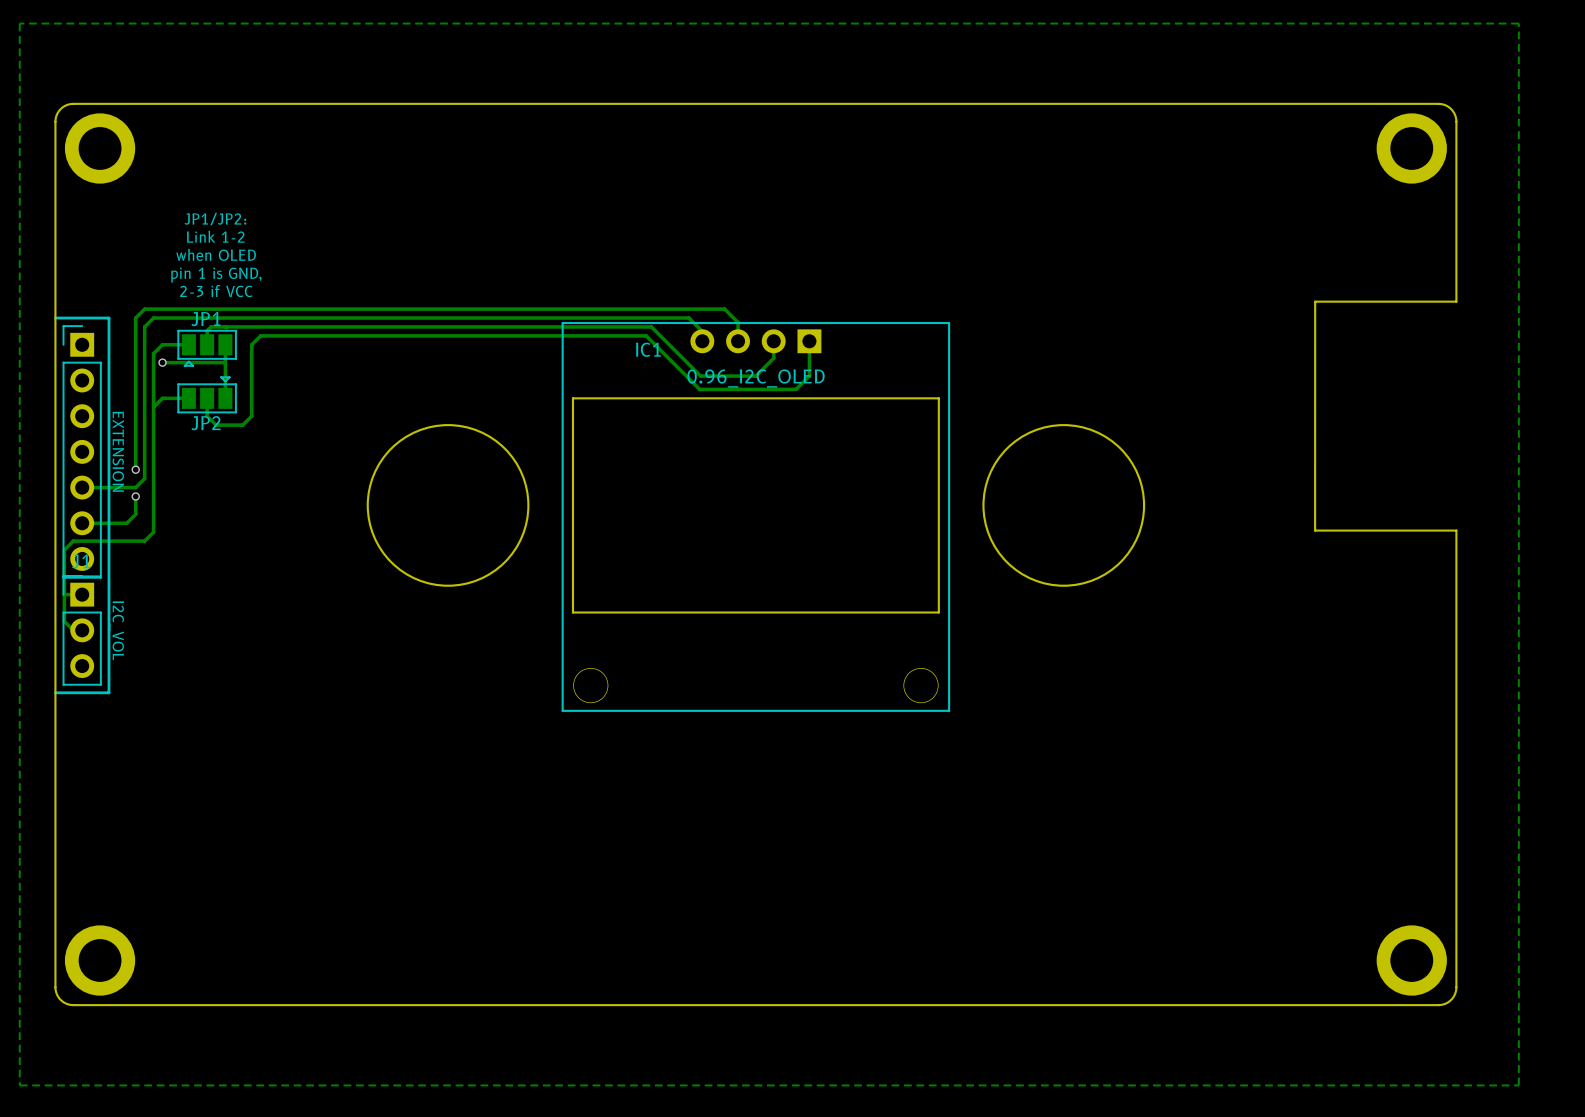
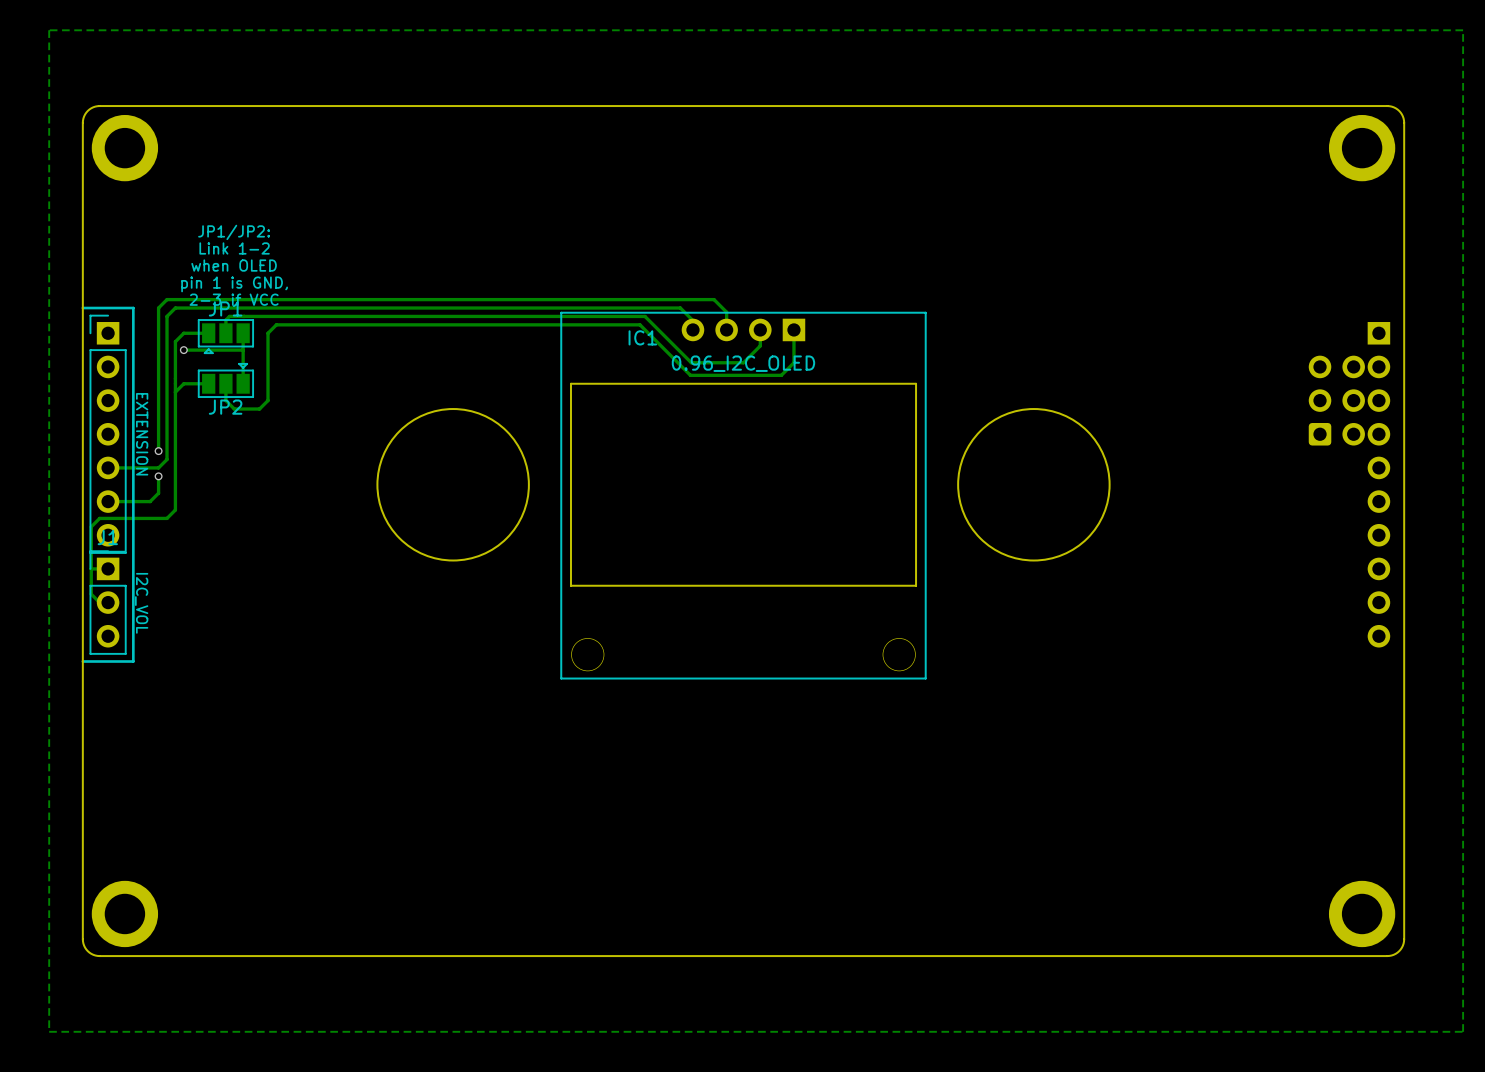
text: JP1/JP2: (215, 219) -> none
text: Link 1-2 (215, 236) -> JP1/JP2: (234, 232)
text: when OLED (216, 254) -> Link 1-2 (234, 248)
text: pin 1 is GND, (216, 275) -> when OLED (234, 265)
text: 2-3 if VCC (216, 291) -> pin 1 is GND, (234, 284)
board edge: (1456, 301) (1315, 301) (1315, 530) (1456, 530) -> (1404, 292) (1404, 508)
text: none -> 2-3 if VCC (234, 299)
part: none -> (1336, 400)
part: none -> (1378, 484)

